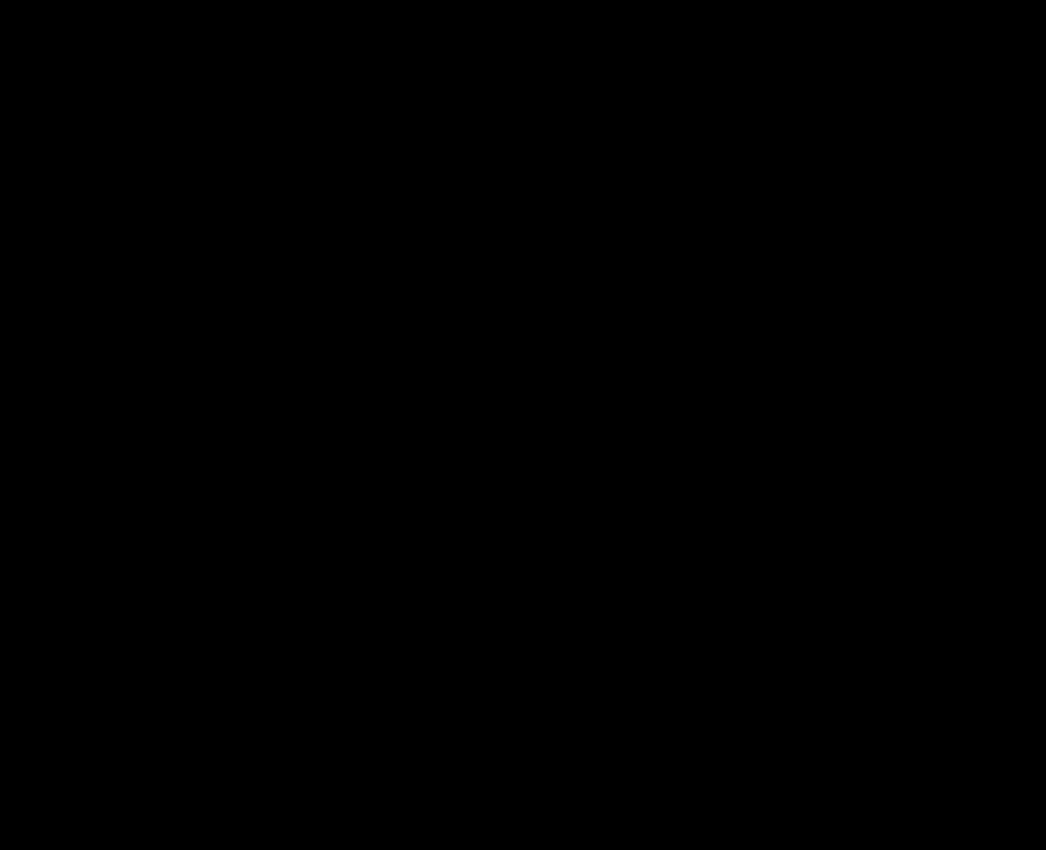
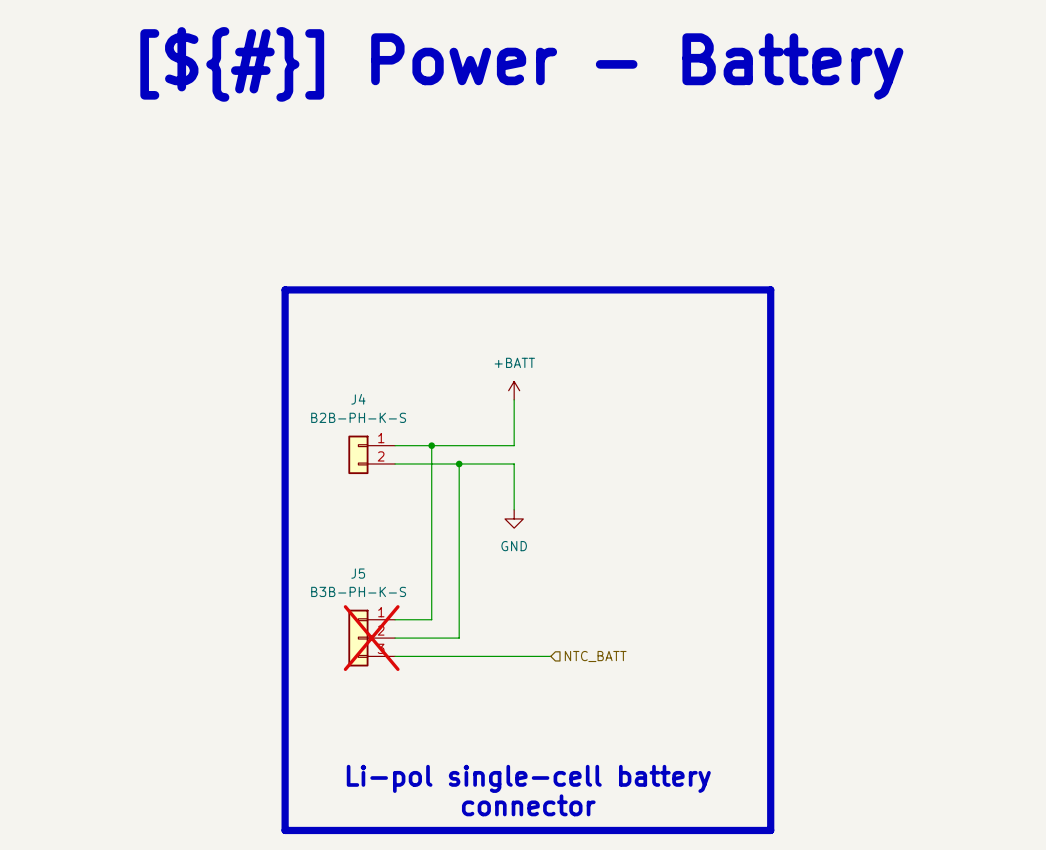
text: none -> [${#}] Power - Battery (521, 64)
line: none -> (285, 289) (770, 289) (770, 830) (285, 830) (285, 289)
power symbol: none -> +BATT (514, 390)
wire: none -> (514, 399) (514, 445) (395, 445)
wire: none -> (431, 445) (431, 619) (395, 619)
junction: none -> (431, 445)
J4: none -> B2B-PH-K-S (371, 454)
wire: none -> (395, 463) (514, 463) (514, 509)
wire: none -> (459, 463) (459, 638) (395, 638)
junction: none -> (459, 463)
power symbol: none -> GND (514, 518)
J5: none -> B3B-PH-K-S (371, 638)
wire: none -> (395, 656) (550, 656)
hierarchical label: none -> NTC_BATT (595, 656)
text: none -> Li-pol single-cell battery (528, 778)
text: none -> connector (528, 805)

